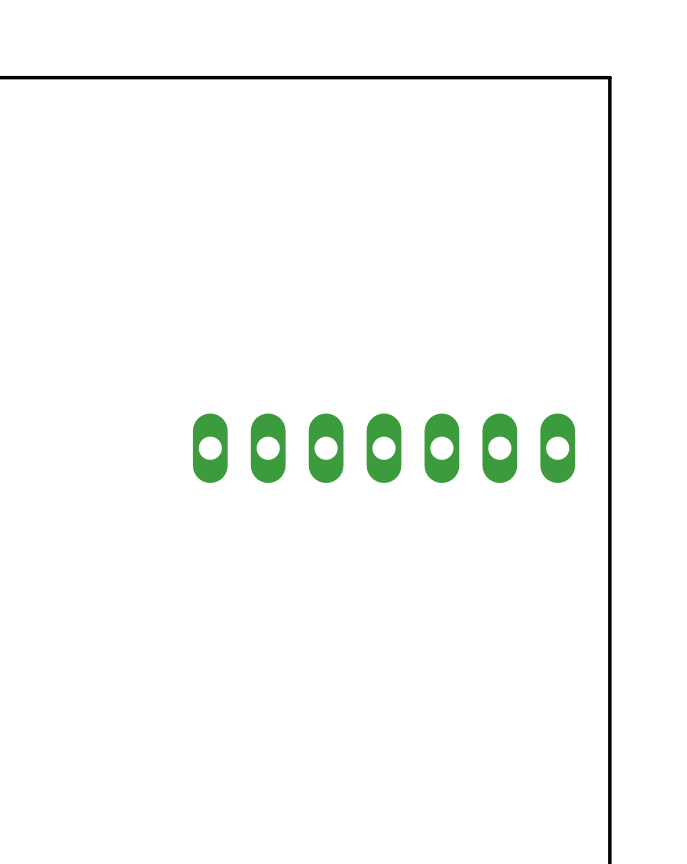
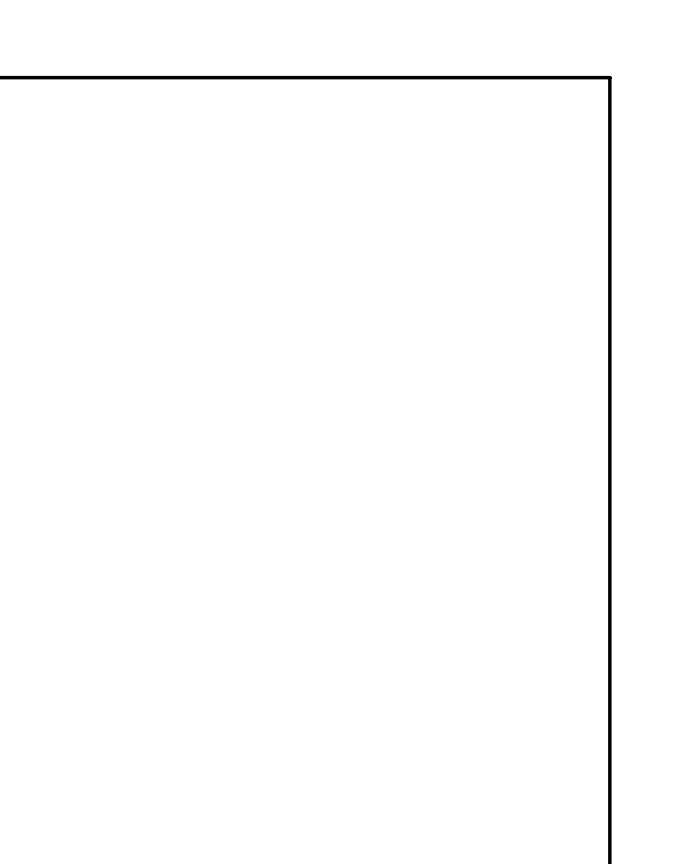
part: (384, 448) -> none

